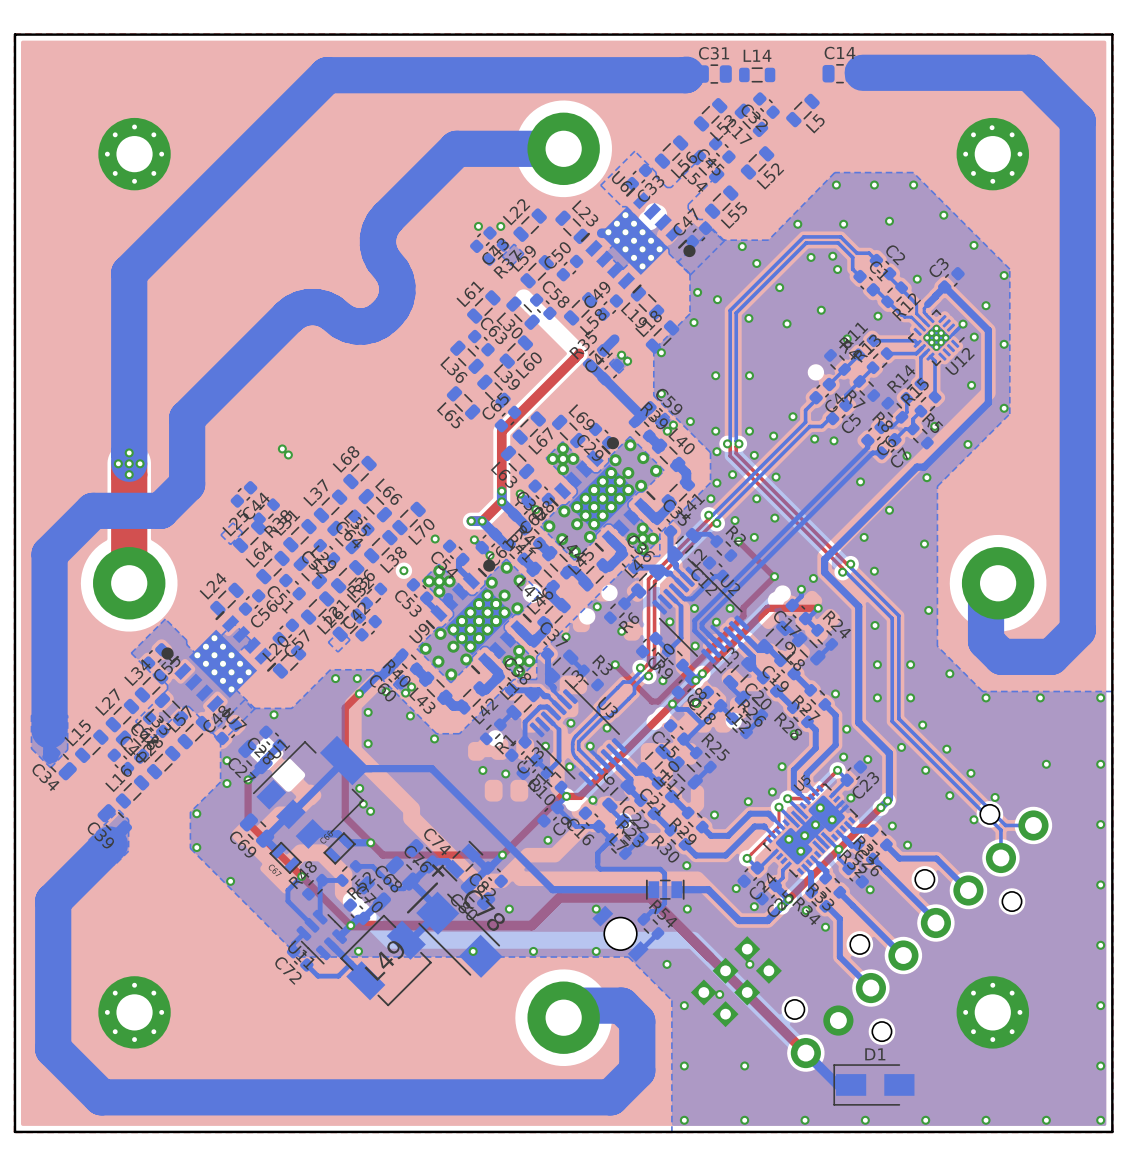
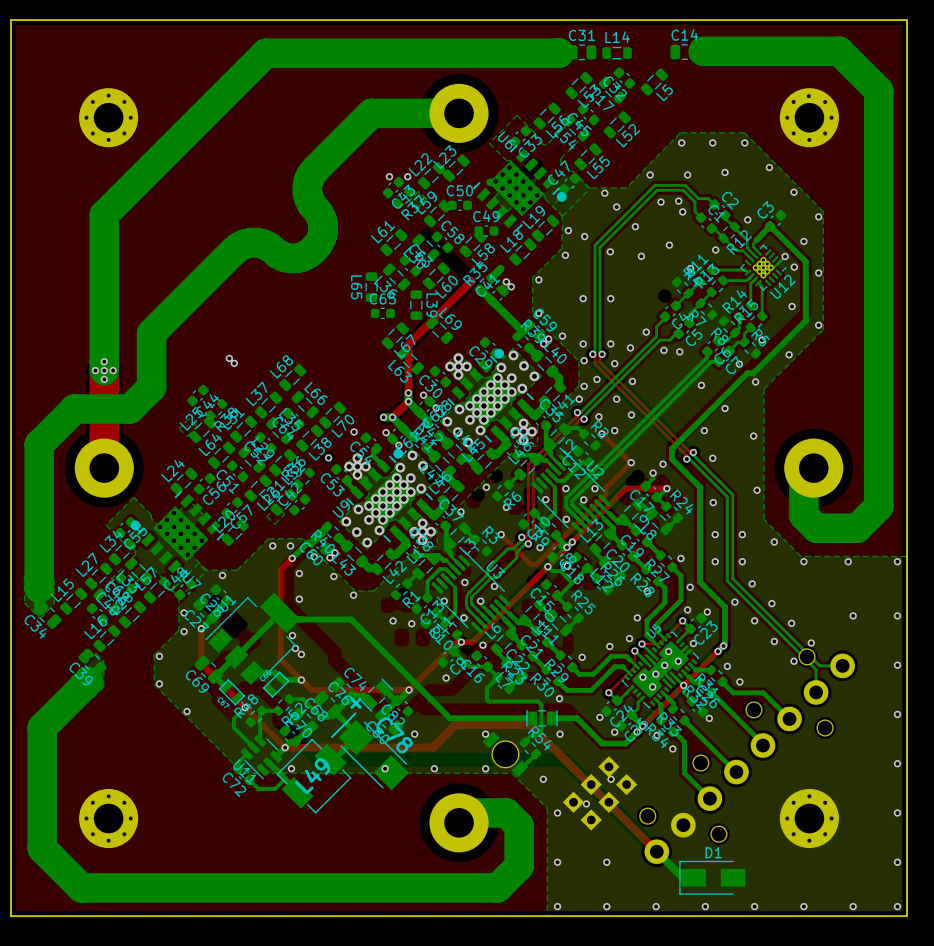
L23 name position: L23 (585, 213) -> L23 (444, 156)
L23 rotation: 0° (572, 227) -> 90° clockwise (456, 168)
C50 rotation: 0° (569, 268) -> 45° clockwise (459, 205)
L19 rotation: 0° (647, 303) -> 90° clockwise (545, 228)
L19 position: (647, 303) -> (545, 228)
C49 rotation: 0° (609, 307) -> 45° clockwise (486, 231)
C49 position: (609, 307) -> (486, 231)
L18 position: (662, 337) -> (522, 252)
C63 position: (481, 343) -> (410, 265)
L60 position: (516, 352) -> (436, 276)
L36 position: (466, 357) -> (396, 277)
L39 rotation: 0° (493, 391) -> 45° clockwise (416, 305)
L65 rotation: 0° (463, 402) -> 45° clockwise (371, 287)
L65 position: (463, 402) -> (371, 287)
C65 rotation: 0° (508, 419) -> 45° clockwise (382, 313)
C65 position: (508, 419) -> (382, 313)
L67 position: (529, 428) -> (395, 335)
L69 position: (568, 431) -> (439, 330)
L63 position: (517, 462) -> (410, 360)
C30 position: (541, 492) -> (440, 376)

